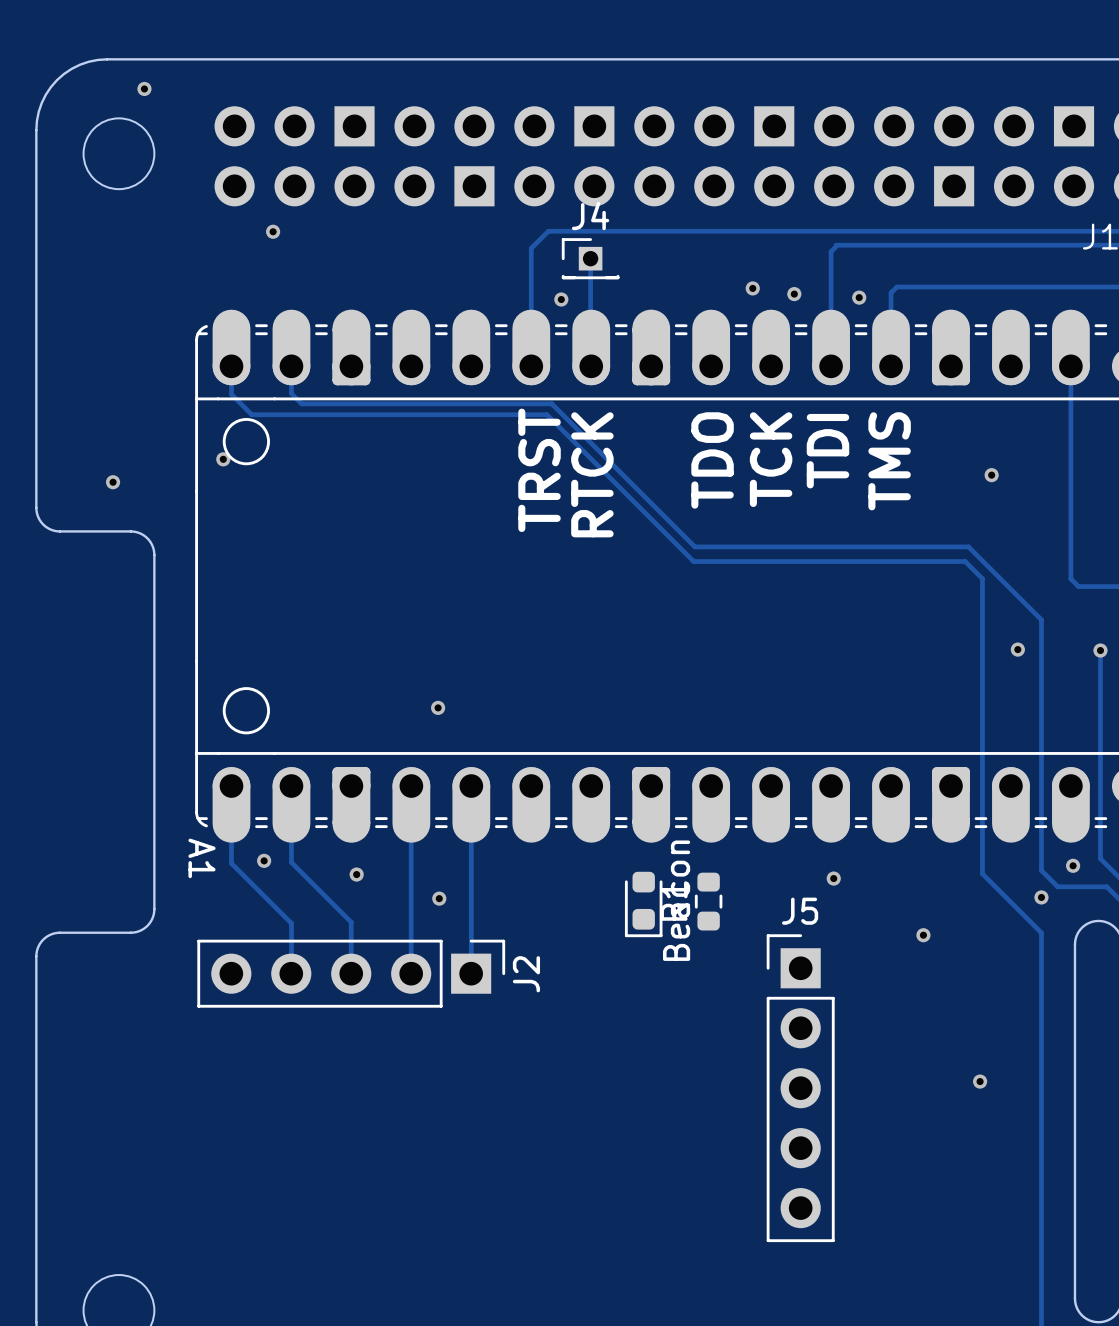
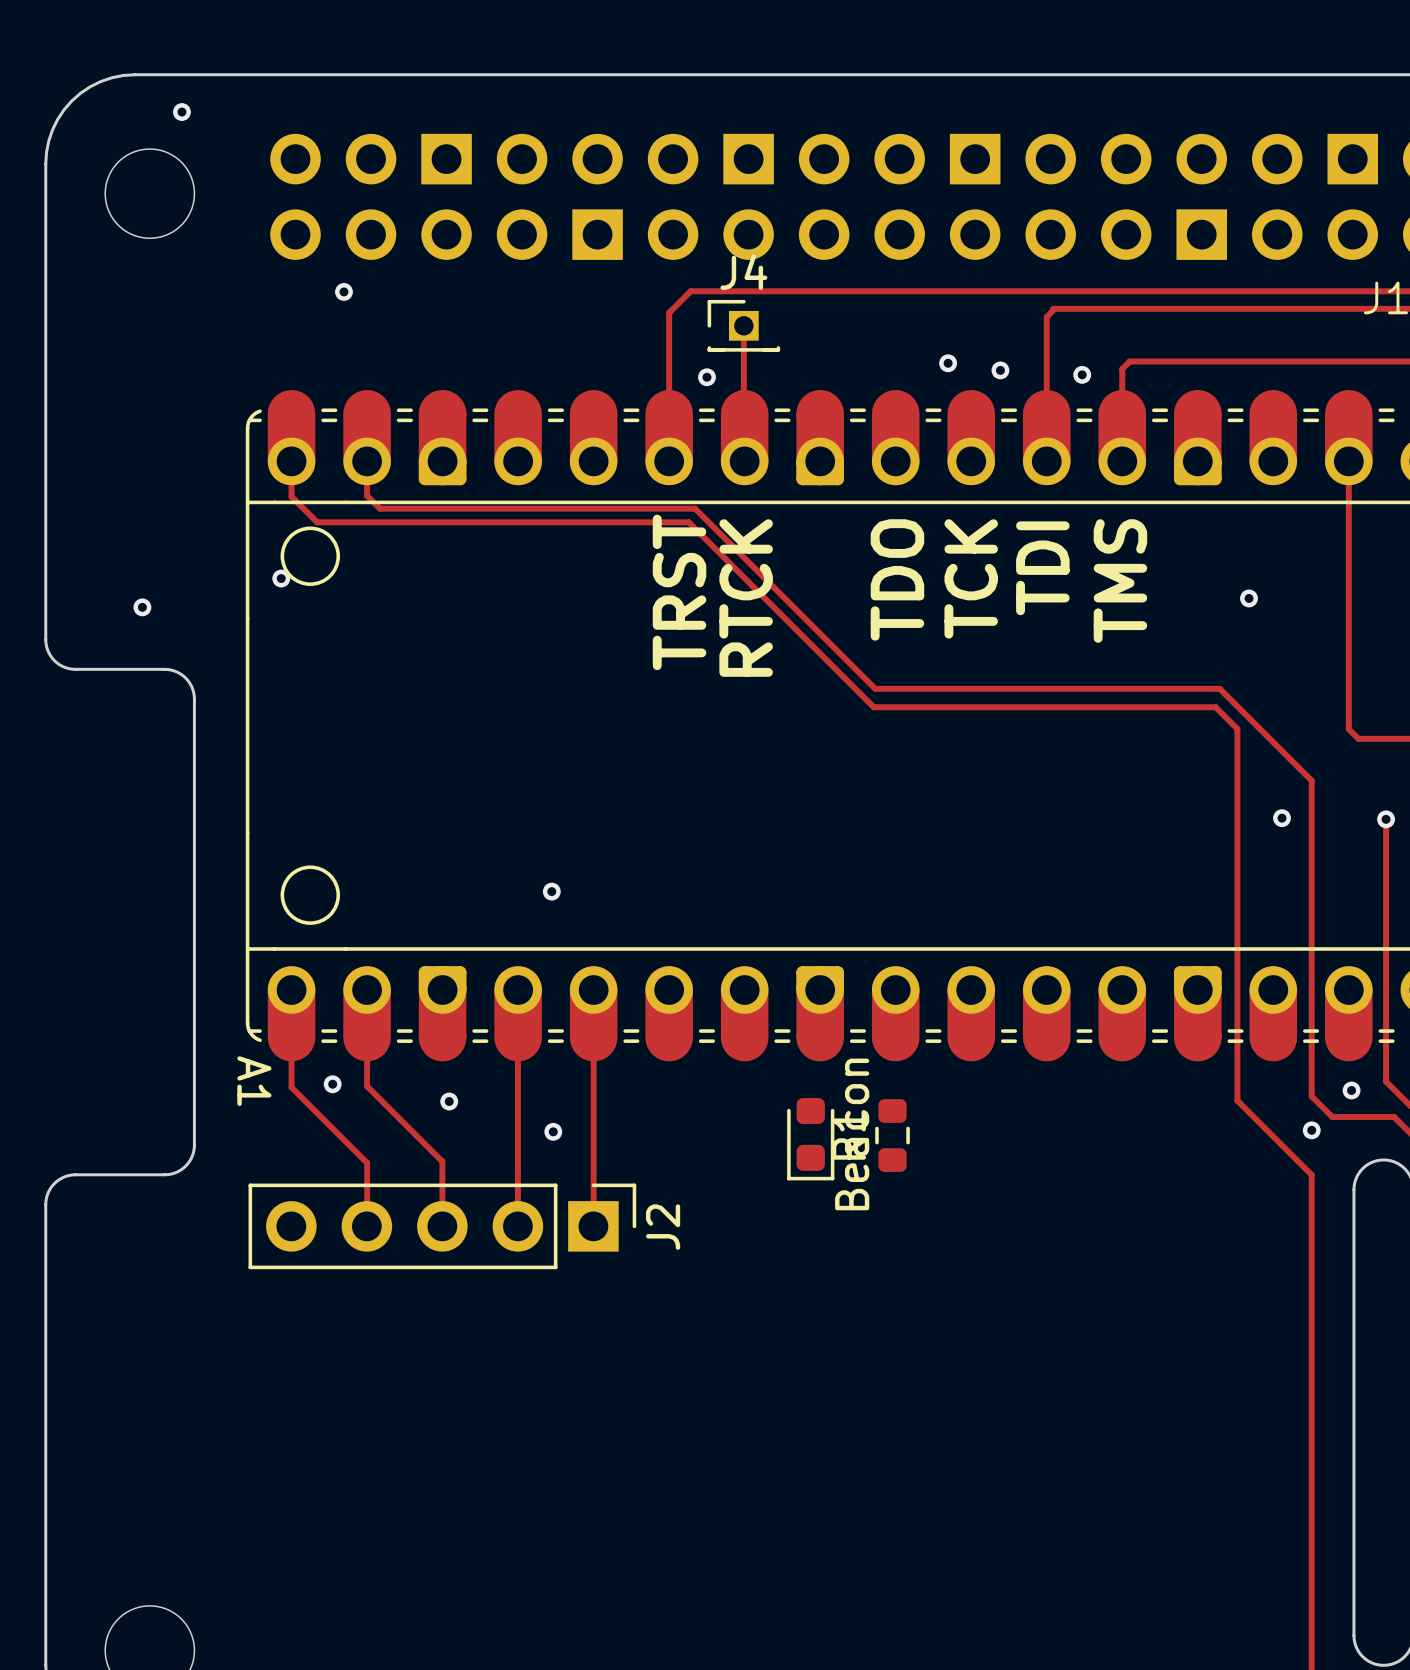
via: (833, 878) -> none
via: (923, 935) -> none
via: (980, 1081) -> none
J5: (800, 1088) -> none

